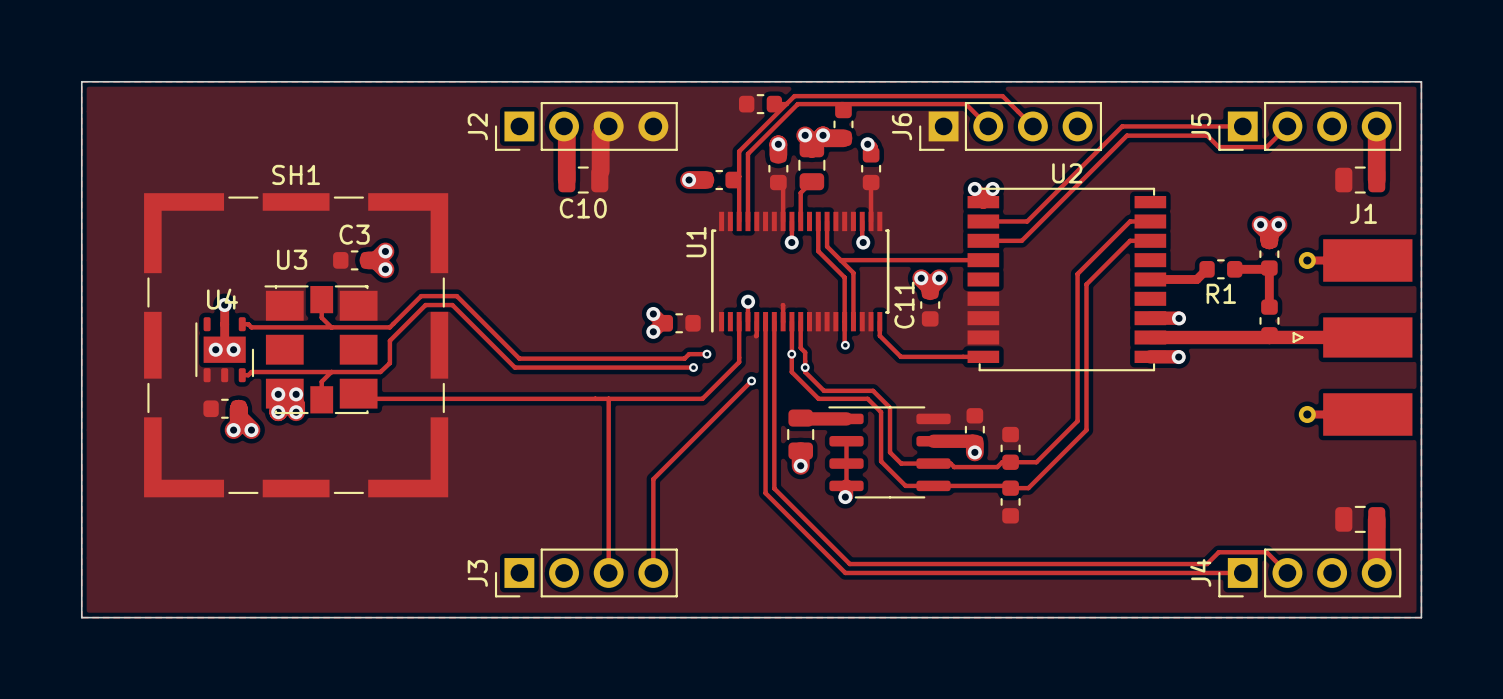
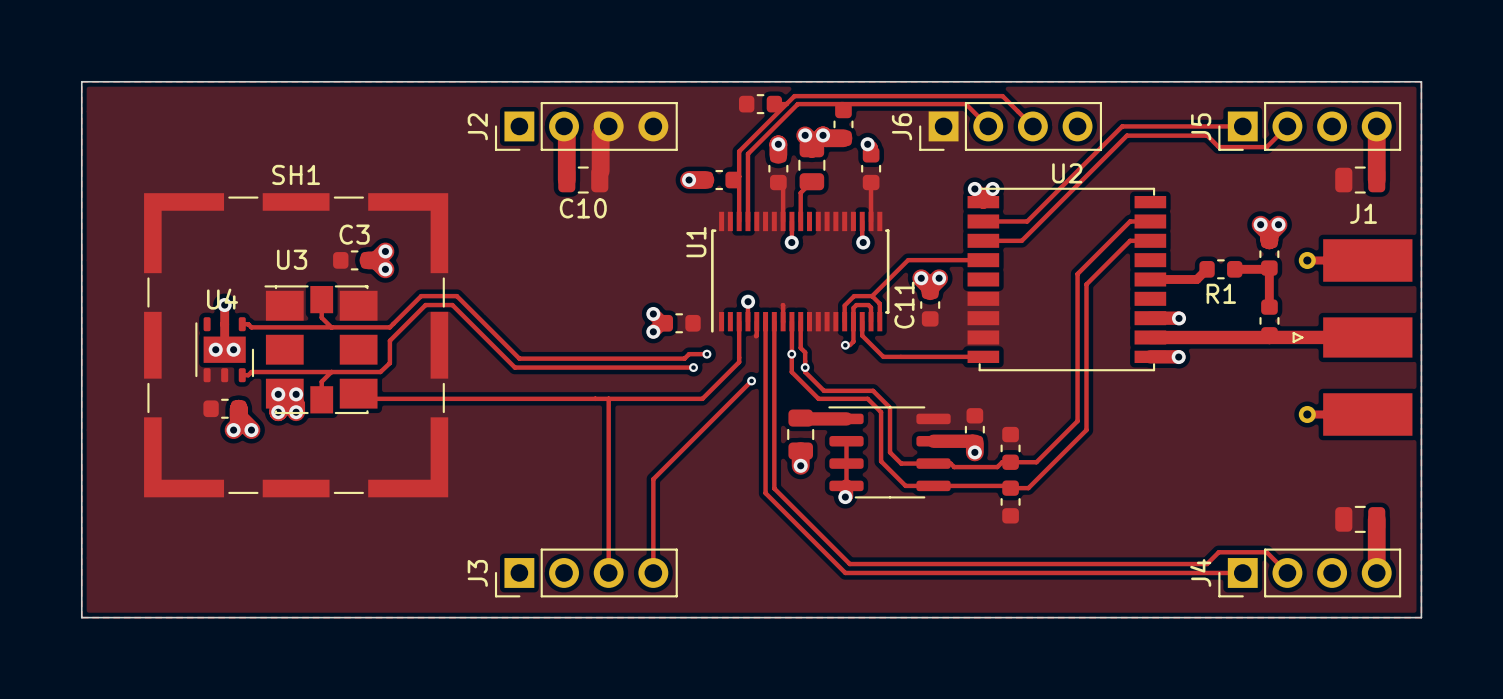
track: (818, 221) (818, 251) (844, 277) (844, 305) -> (872, 296) (854, 296) (844, 305)
track: (827, 221) (827, 246) (853, 272) (853, 308) -> (871, 321) (871, 307) (868, 305) (856, 305) (853, 308)
track: (840, 260) (908, 260) -> (872, 296) (908, 260)
track: none -> (872, 296) (879, 303) (879, 321)
track: (844, 321) (845, 345) -> none
track: none -> (853, 321) (853, 341) (849, 345)
track: (879, 321) (879, 335) (900, 356) -> (862, 321) (862, 335) (883, 356) (900, 356)

